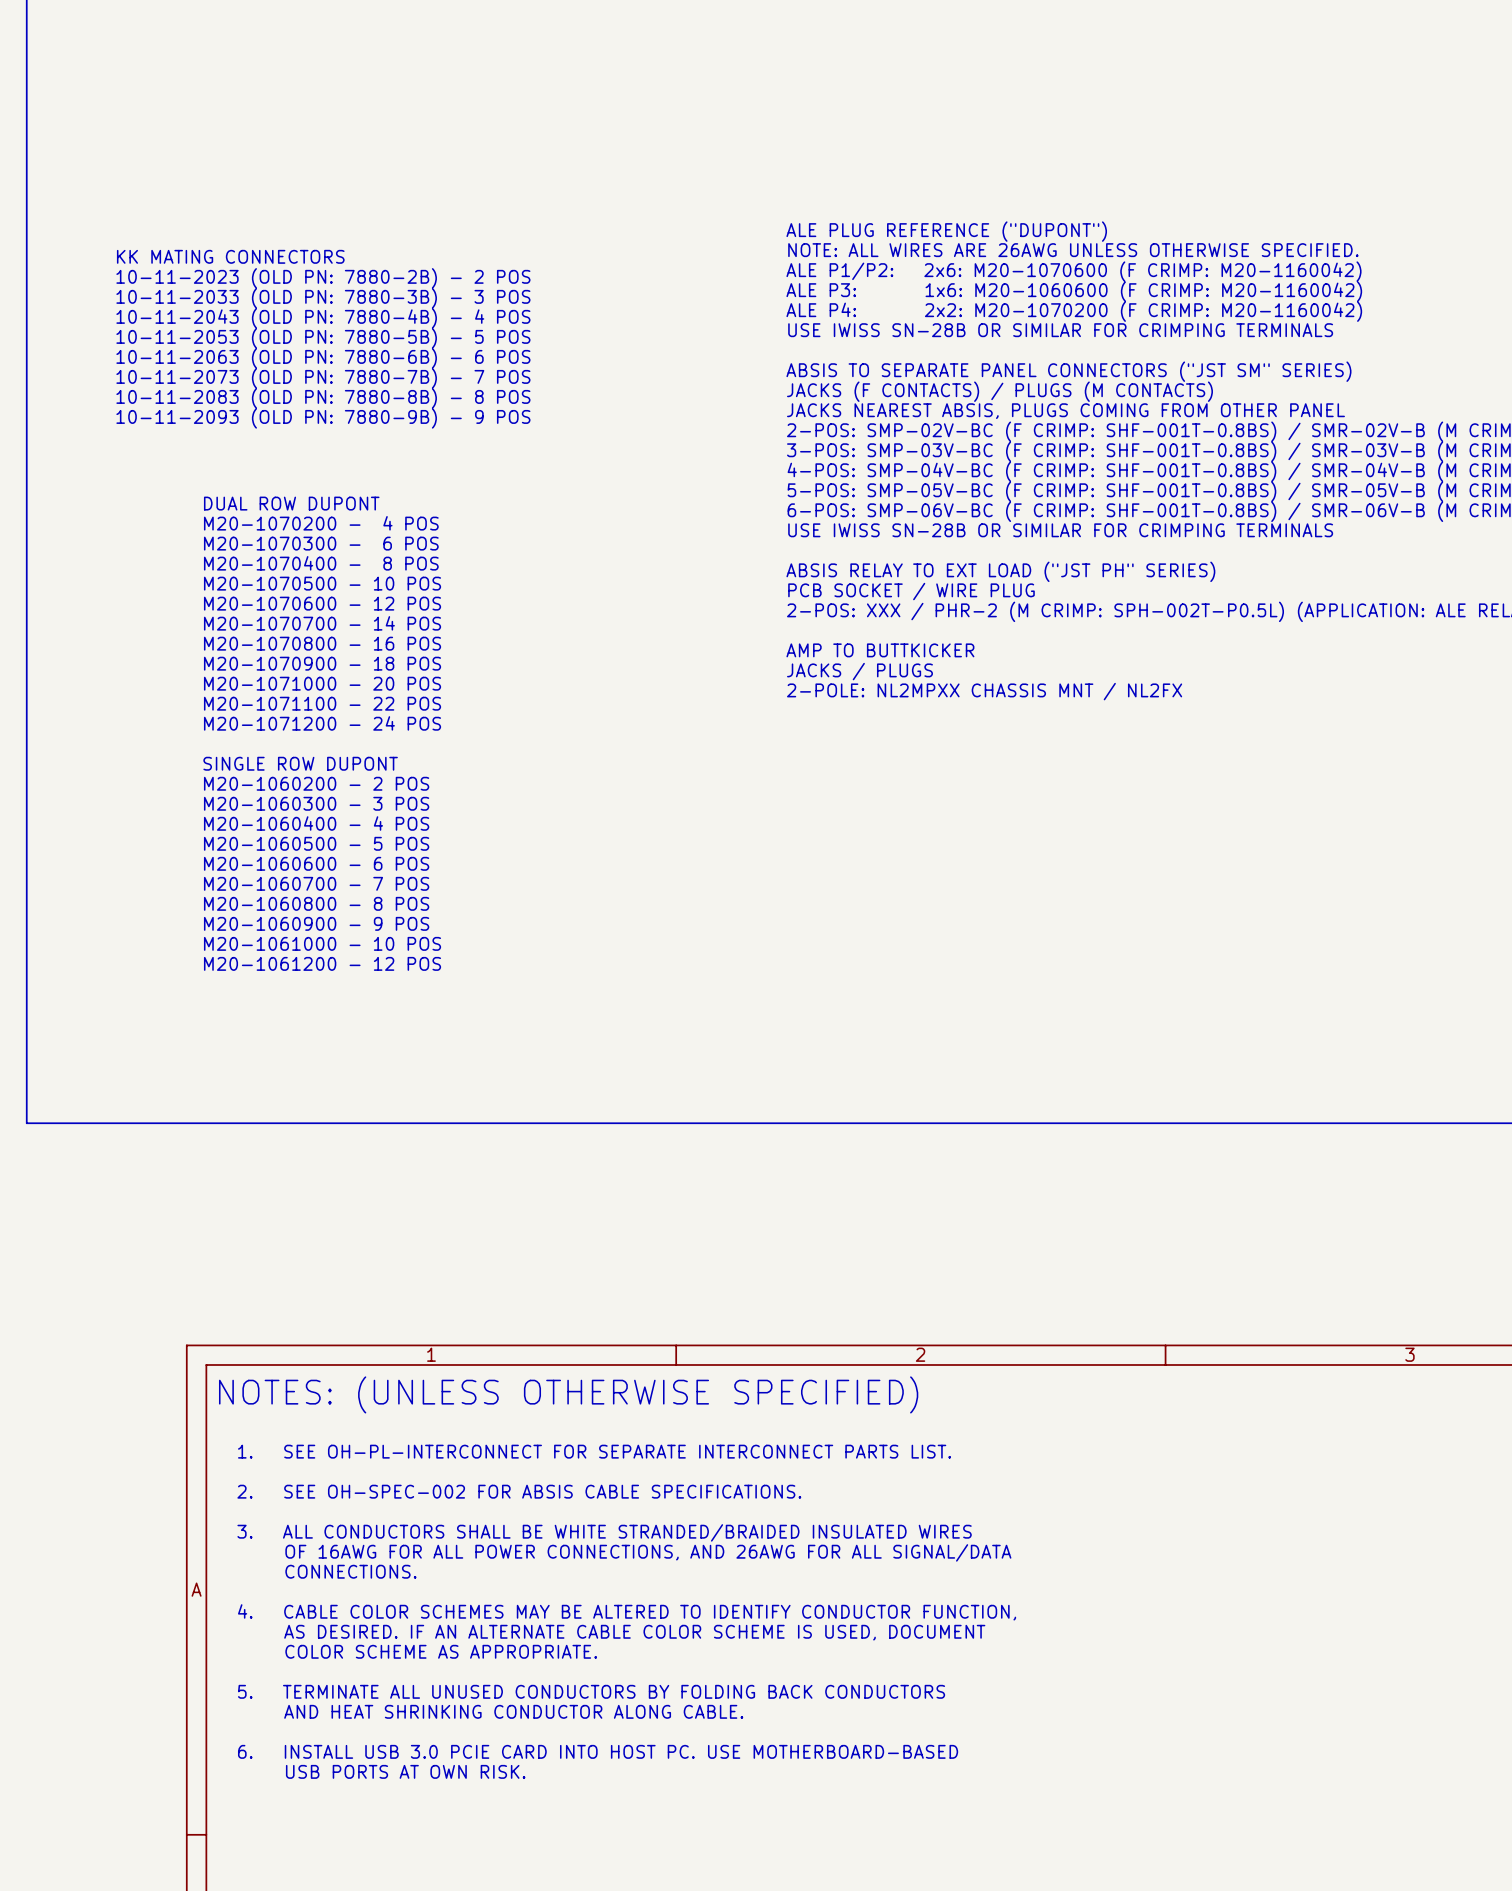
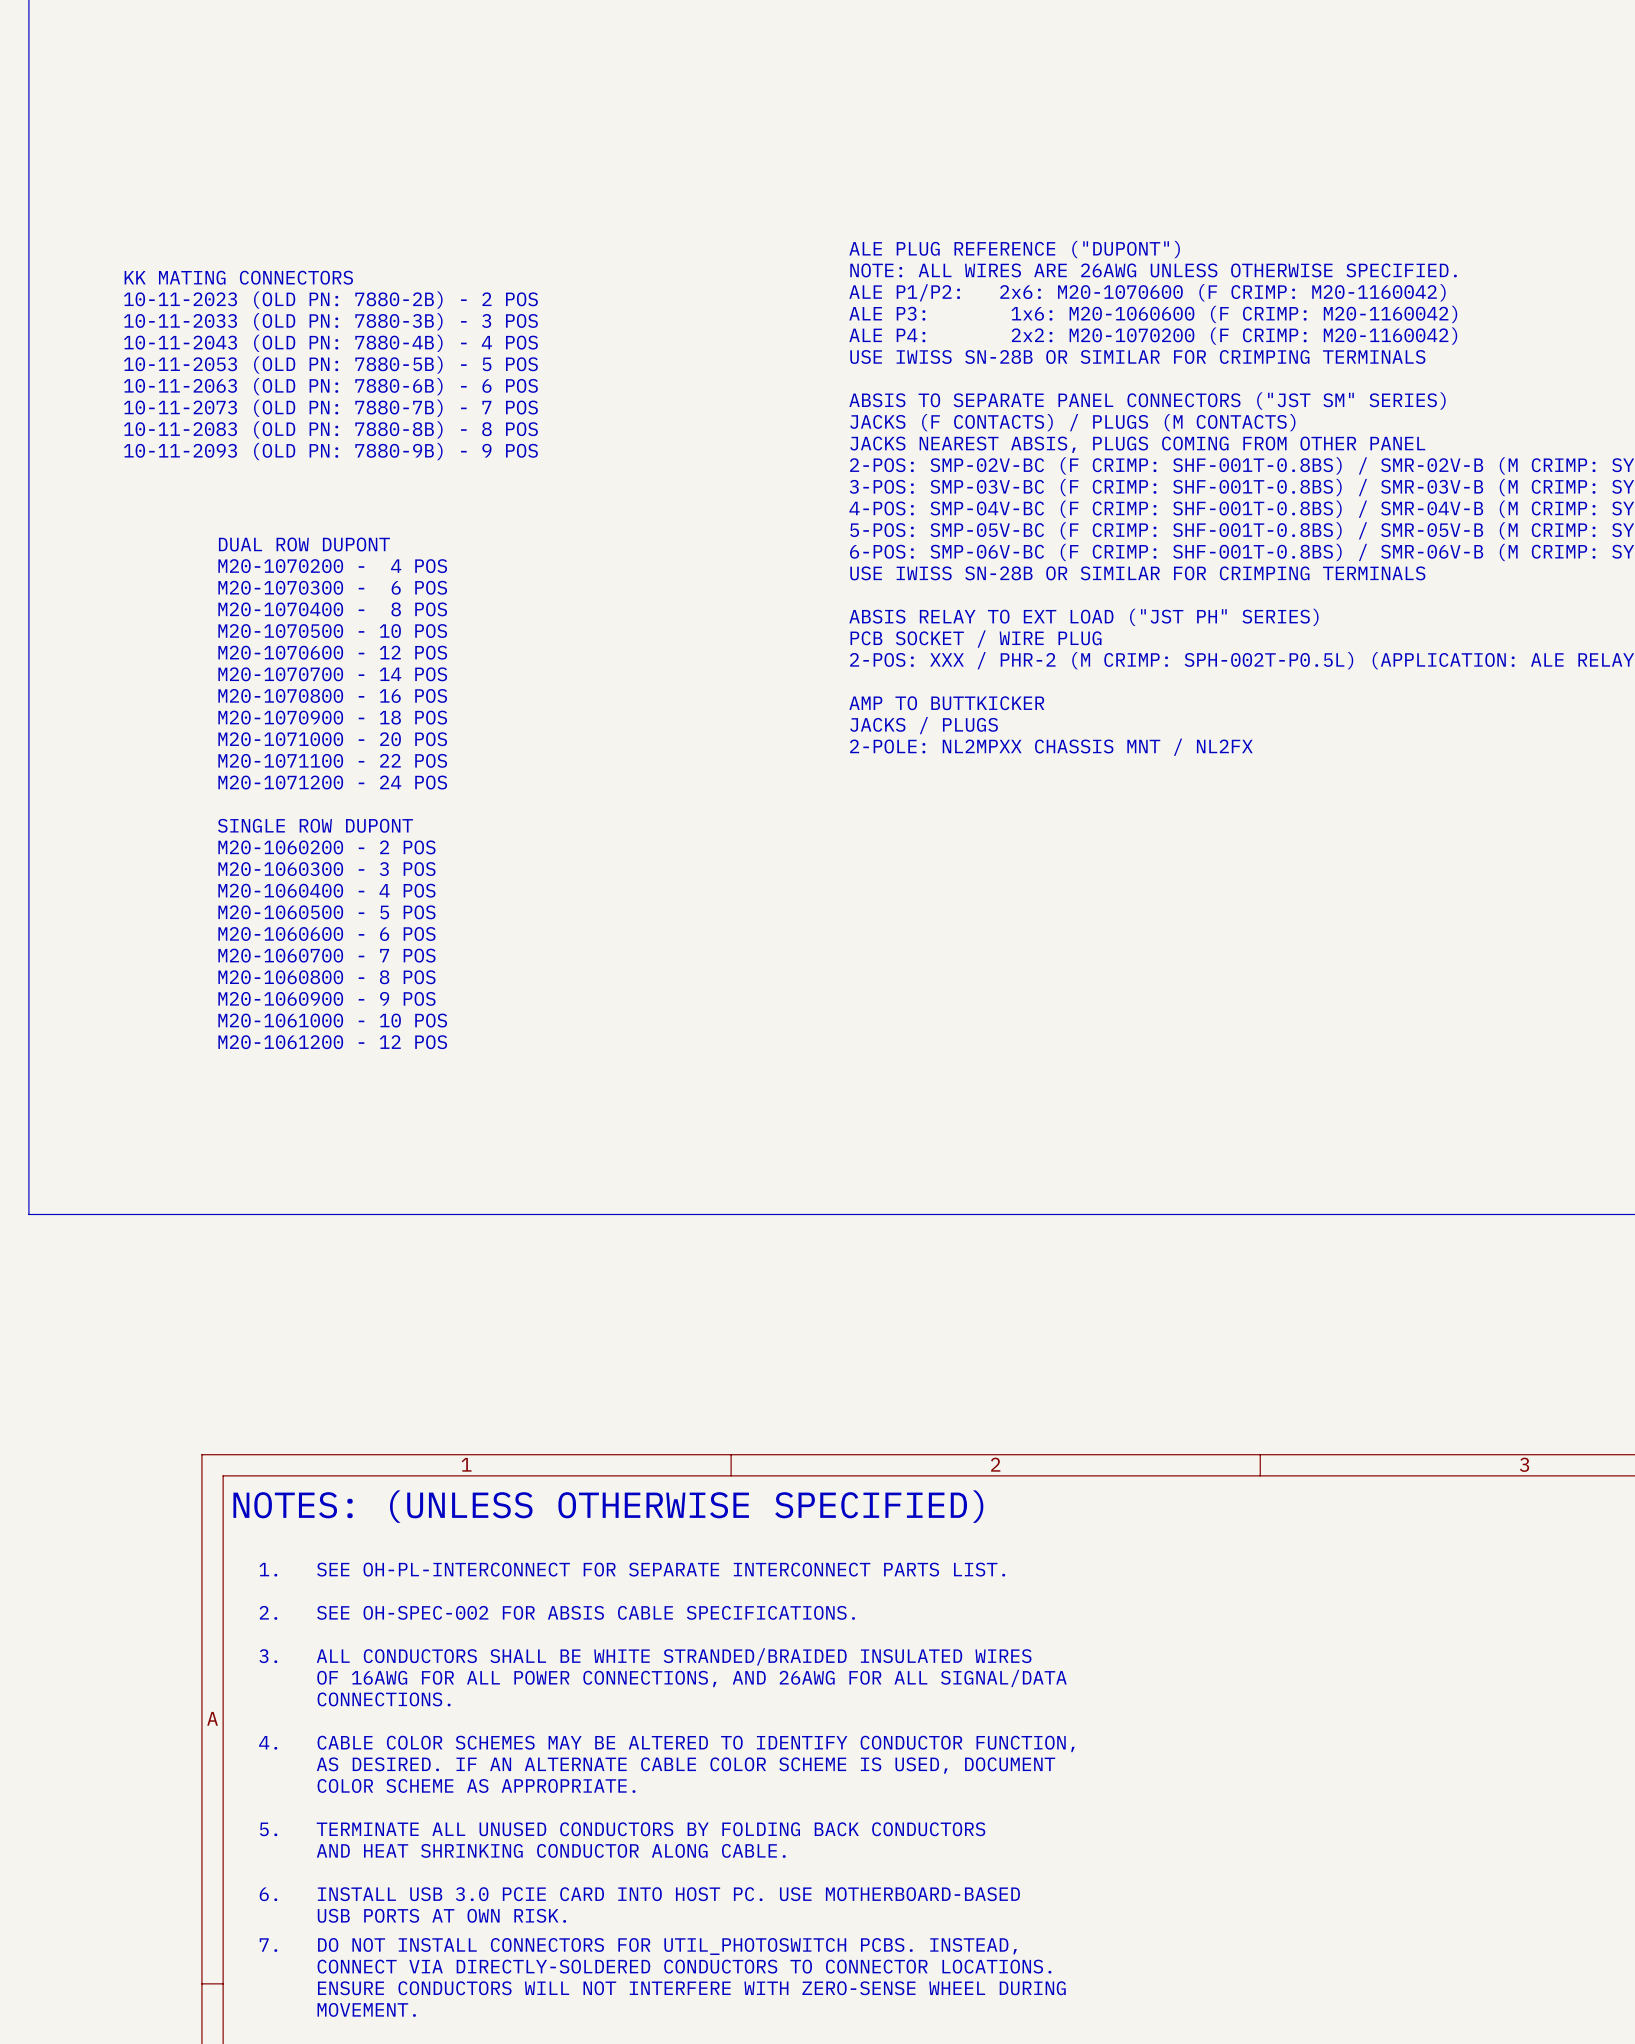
text: none -> 7. DO NOT INSTALL CONNECTORS FOR UTIL_PHOTOSWITCH PCBS. INSTEAD, (638, 1946)
text: none -> CONNECT VIA DIRECTLY-SOLDERED CONDUCTORS TO CONNECTOR LOCATIONS. (684, 1966)
text: none -> ENSURE CONDUCTORS WILL NOT INTERFERE WITH ZERO-SENSE WHEEL DURING (691, 1988)
text: none -> MOVEMENT. (366, 2009)

